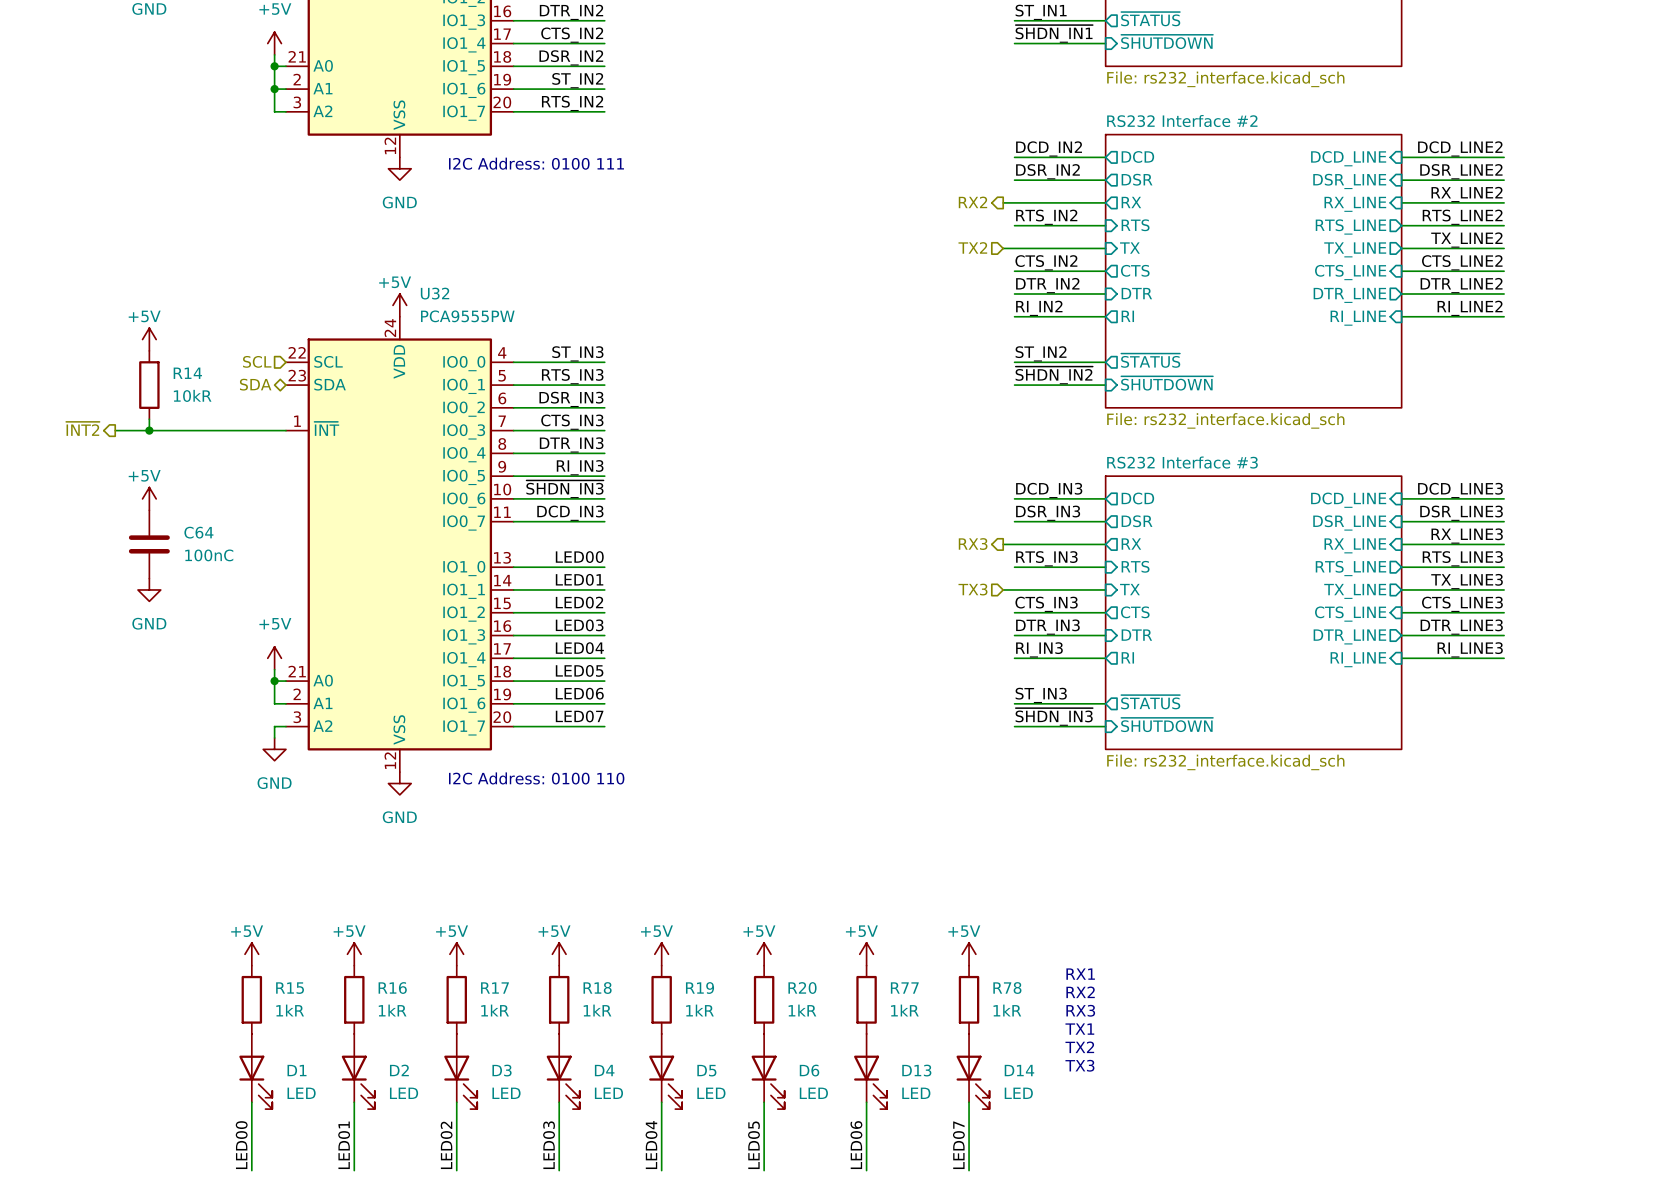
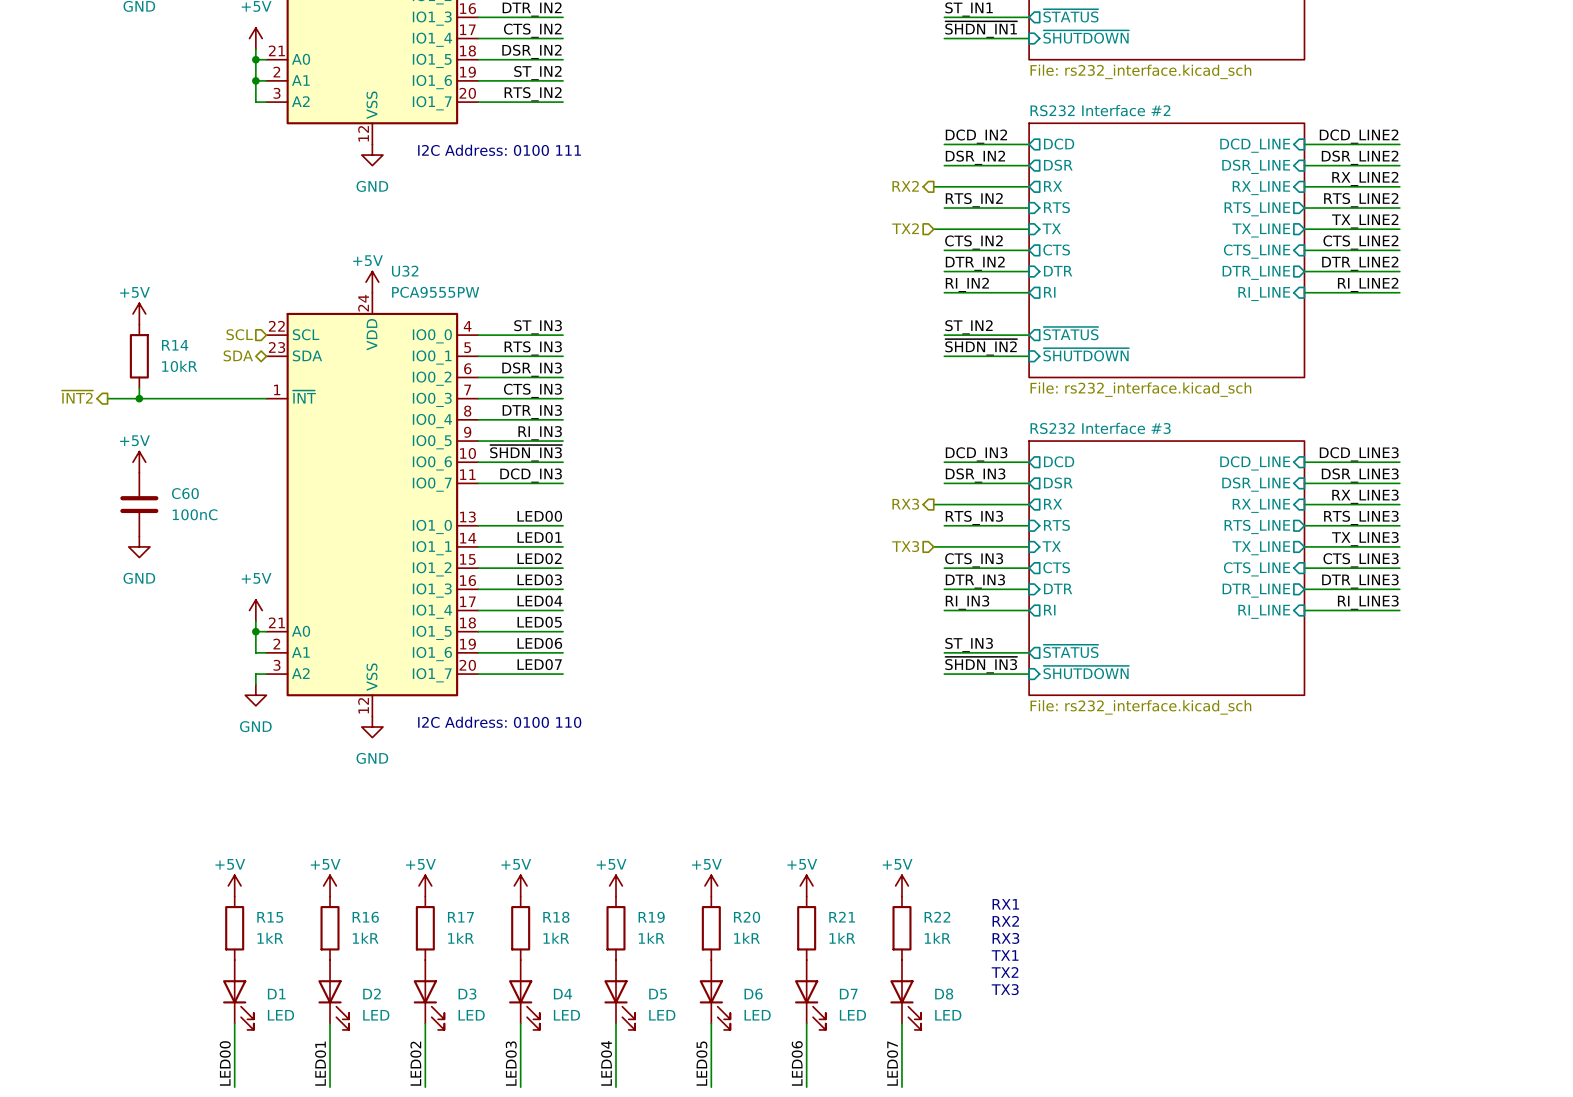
C64 name: C64 (198, 532) -> C60 (185, 493)
R77 name: R77 (904, 988) -> R21 (842, 917)
R78 name: R78 (1007, 988) -> R22 (937, 917)
D13 name: D13 (916, 1070) -> D7 (848, 994)
D14 name: D14 (1019, 1070) -> D8 (944, 994)

